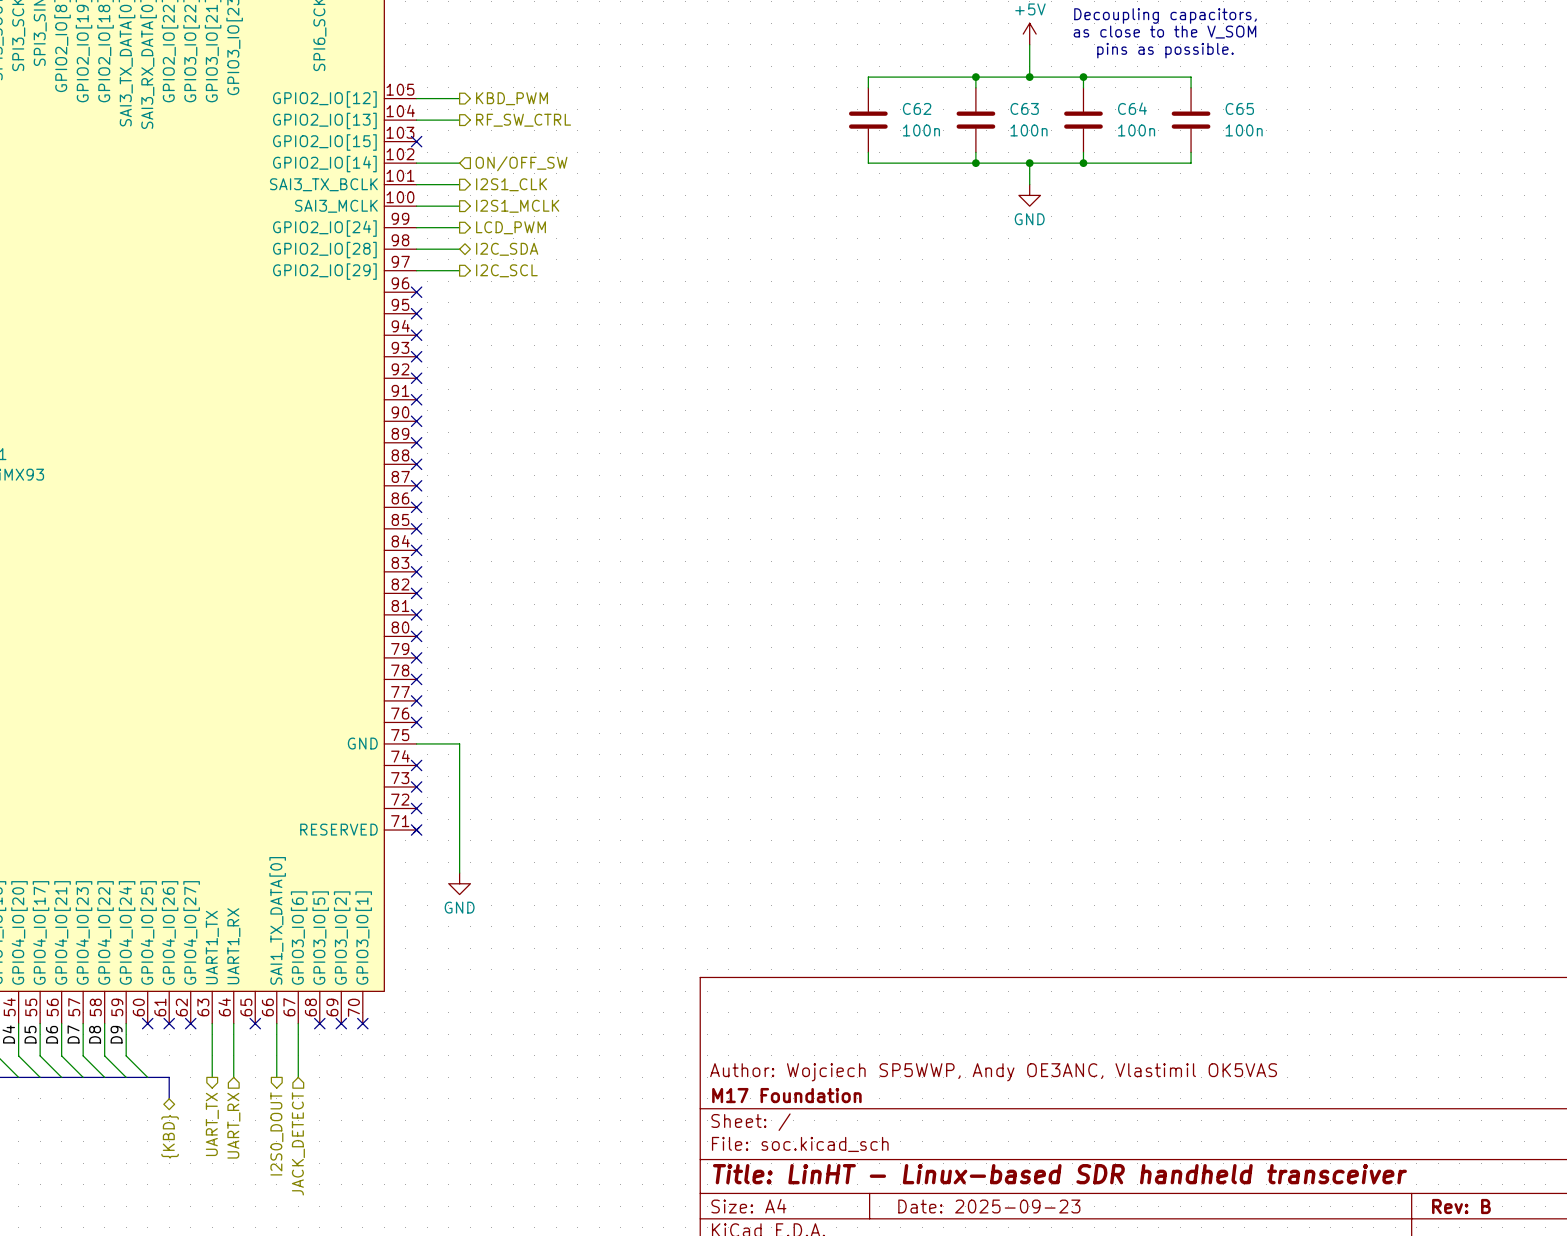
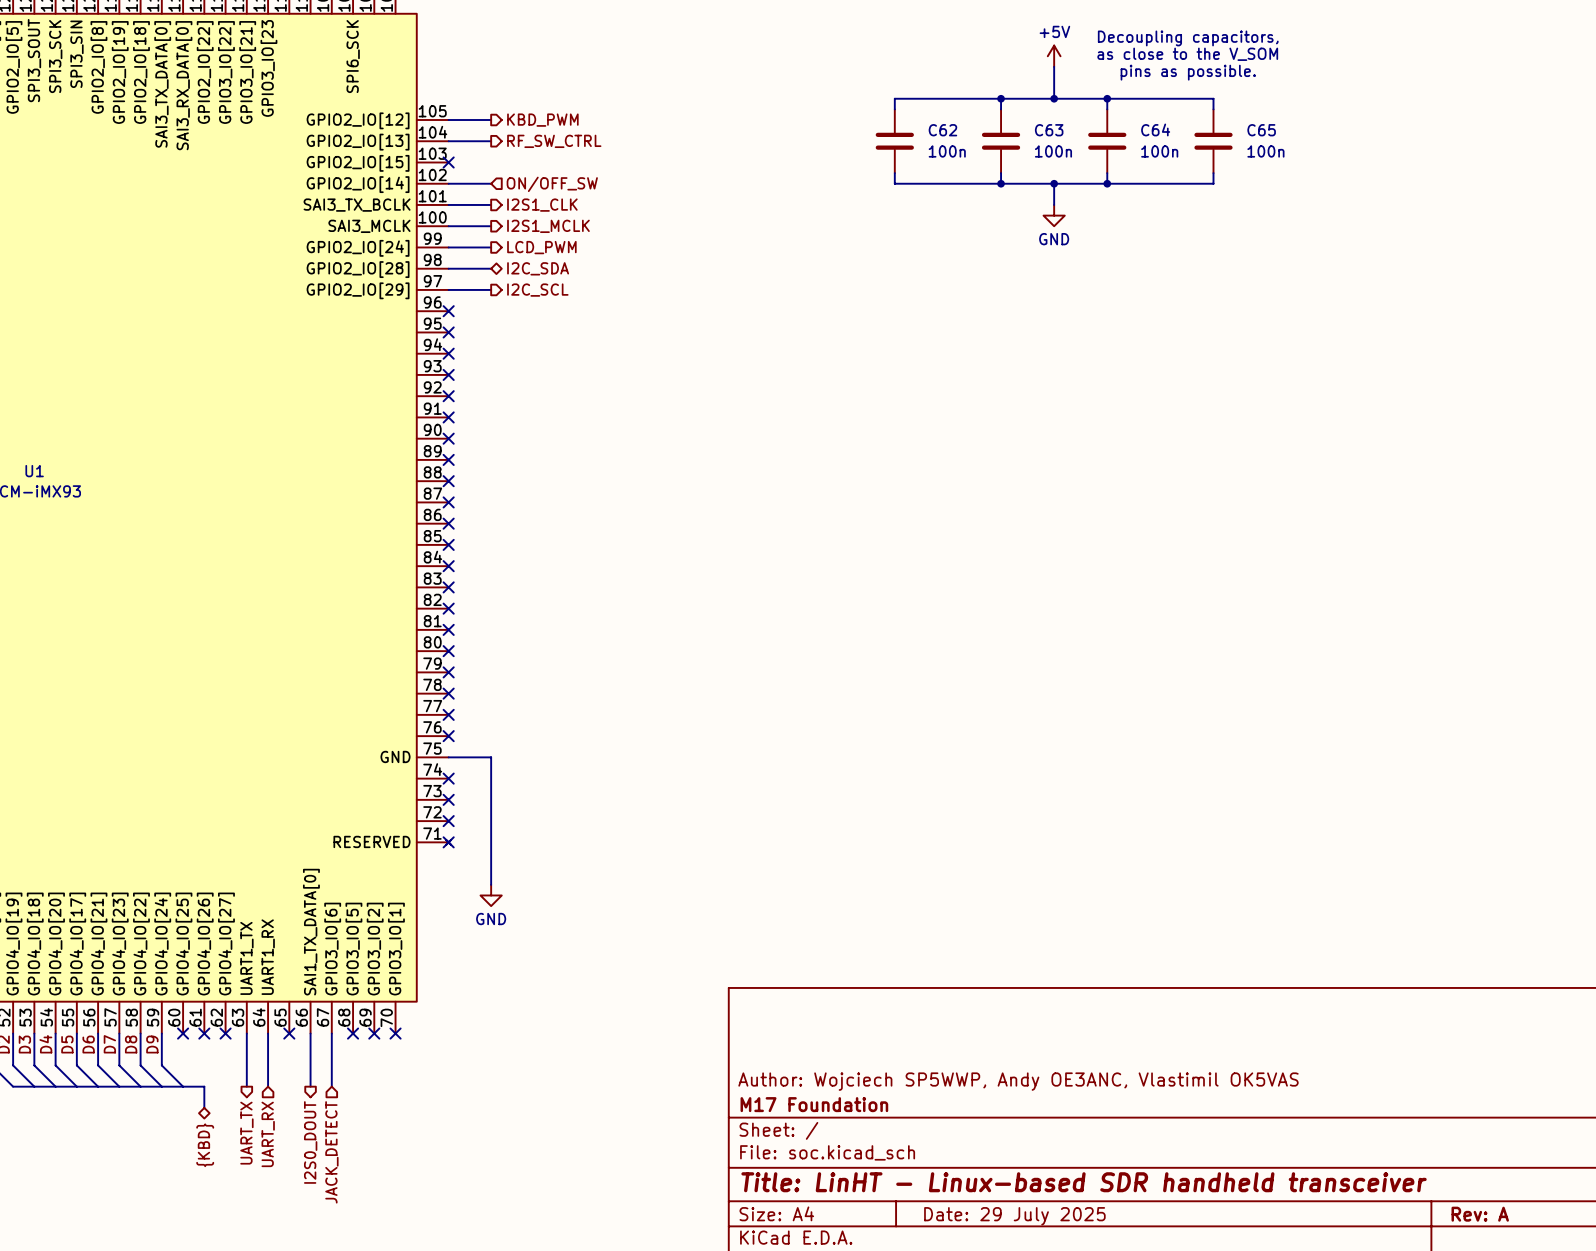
title block: Date: 2025-09-23 (989, 1206) -> Date: 29 July 2025 (1014, 1216)
title block: Rev: B (1461, 1206) -> Rev: A (1480, 1214)

